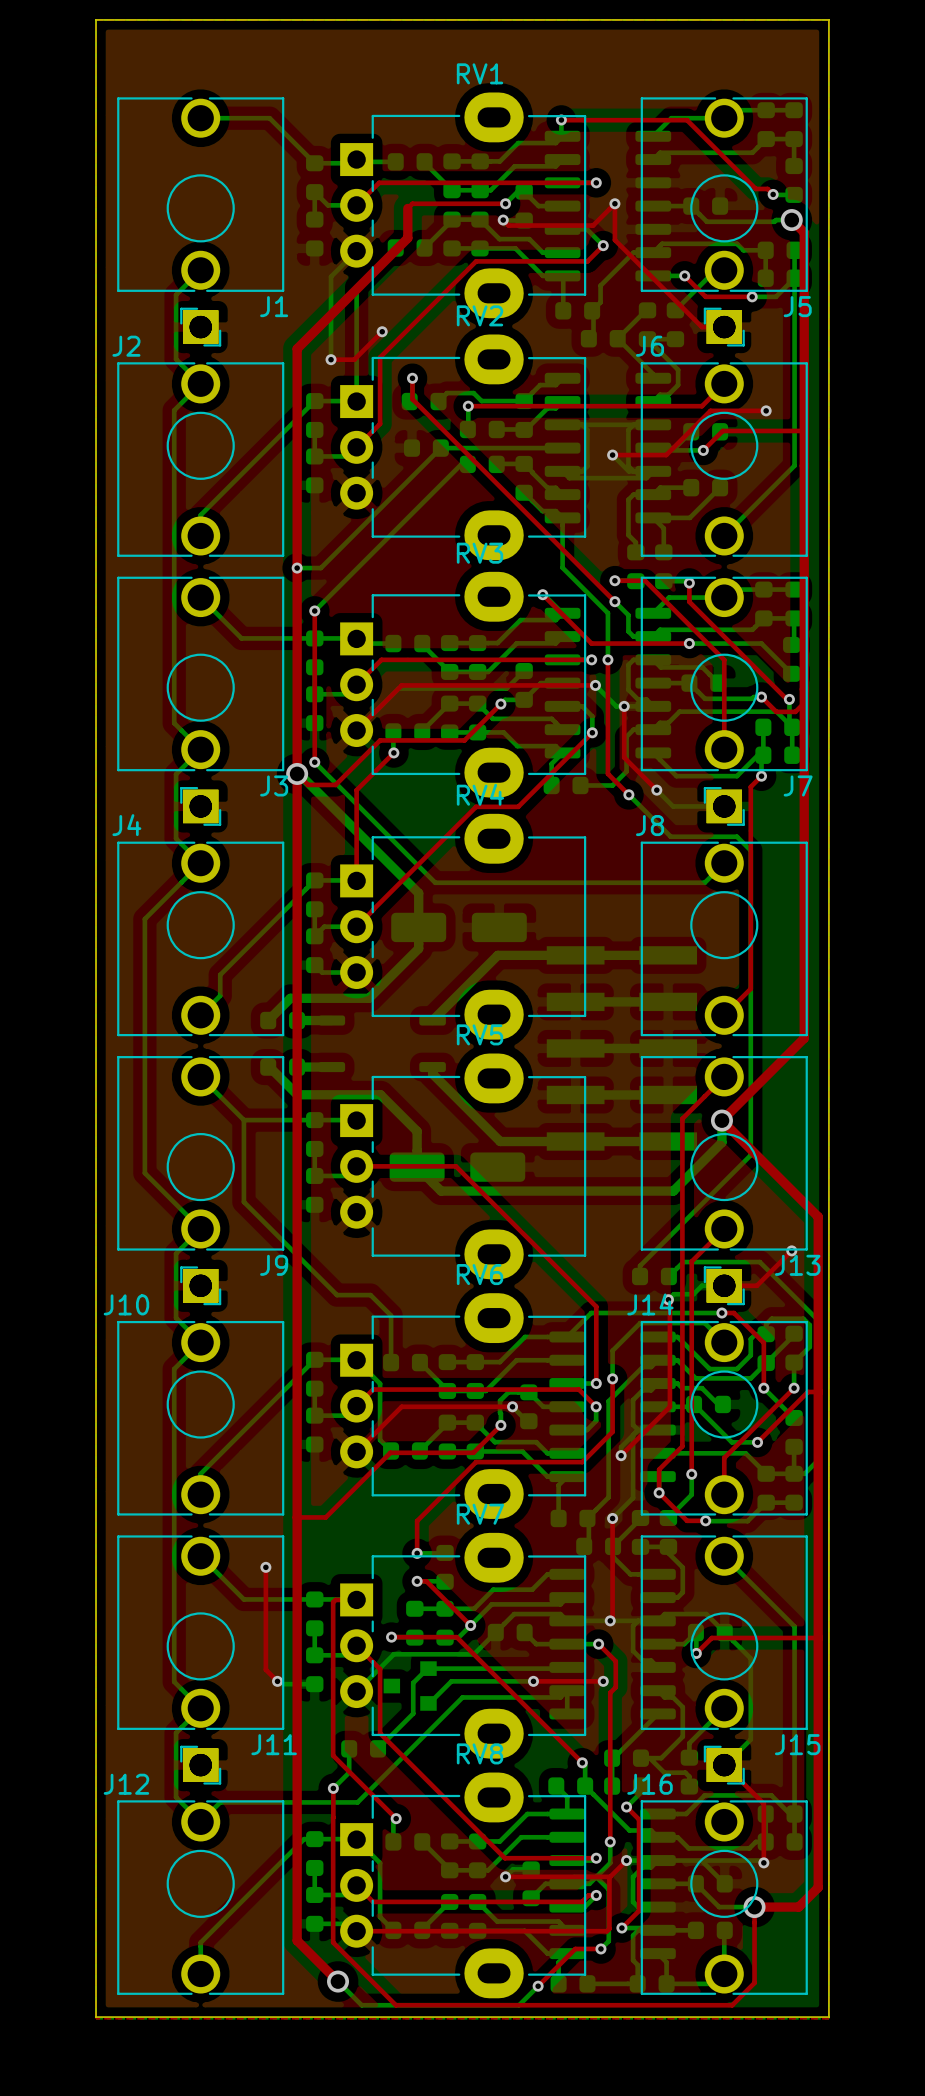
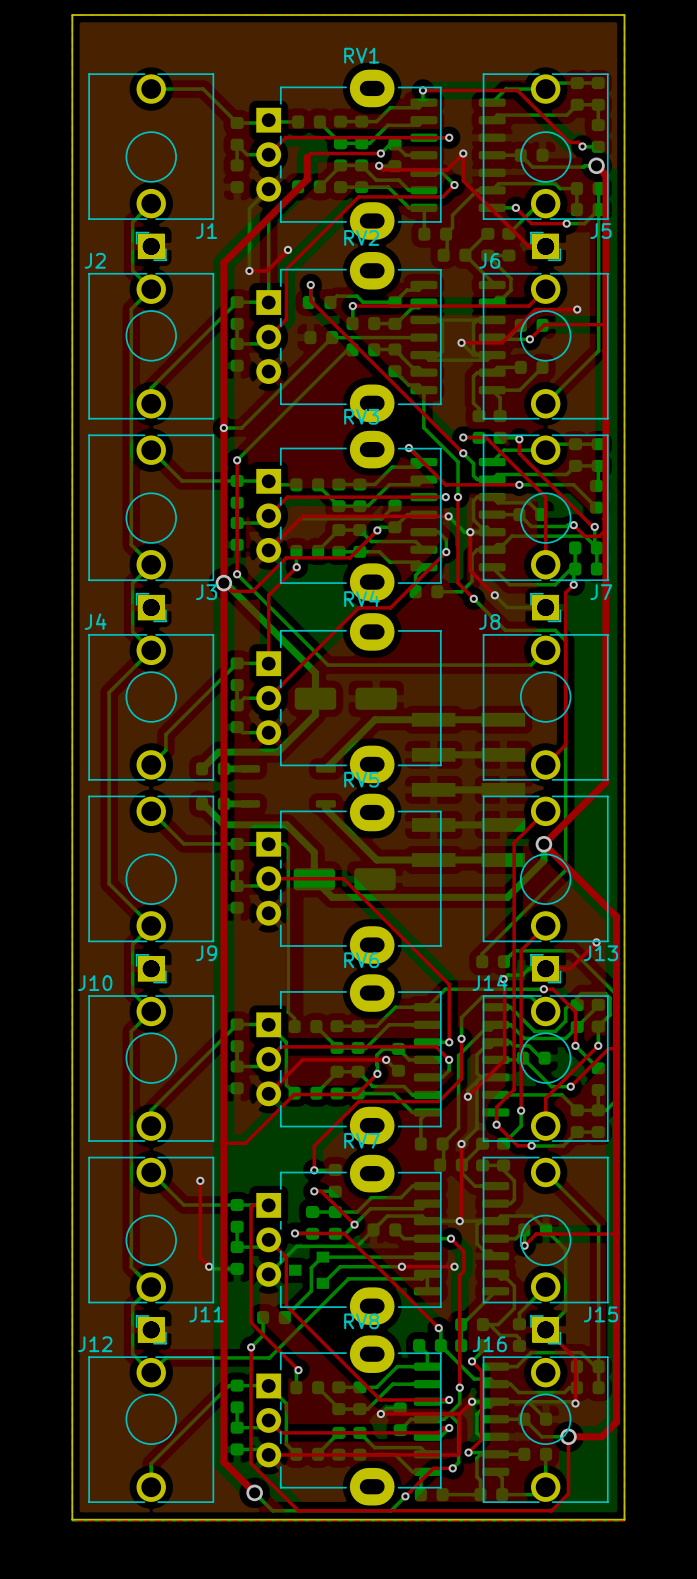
bottom track: (243, 1120) (243, 1201) (337, 1295) (370, 1295) (391, 1315) (391, 1352) -> (237, 843) (284, 844) (288, 847) (288, 1012) (294, 1018)

